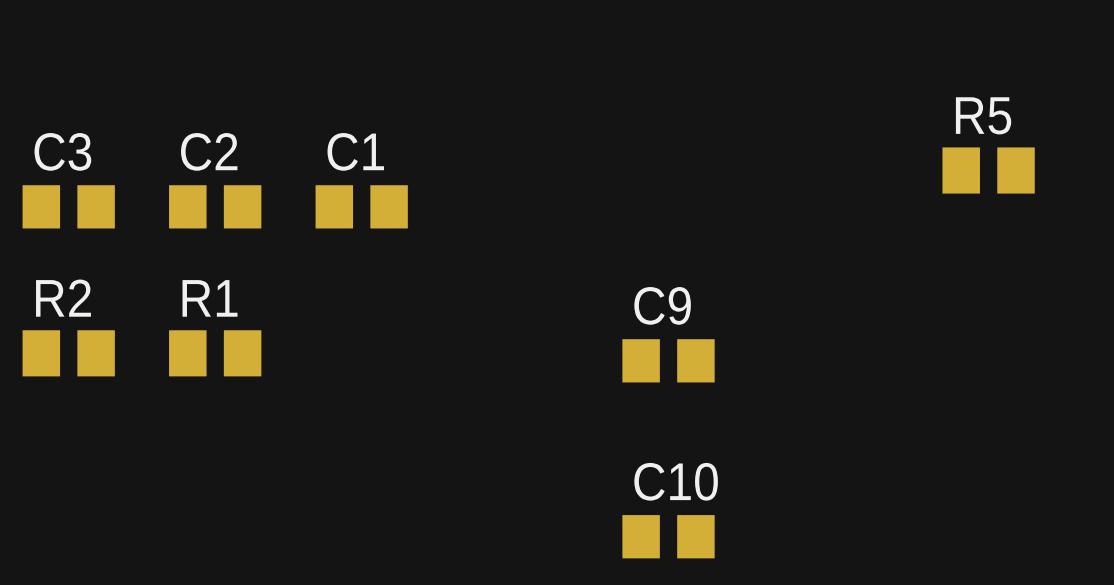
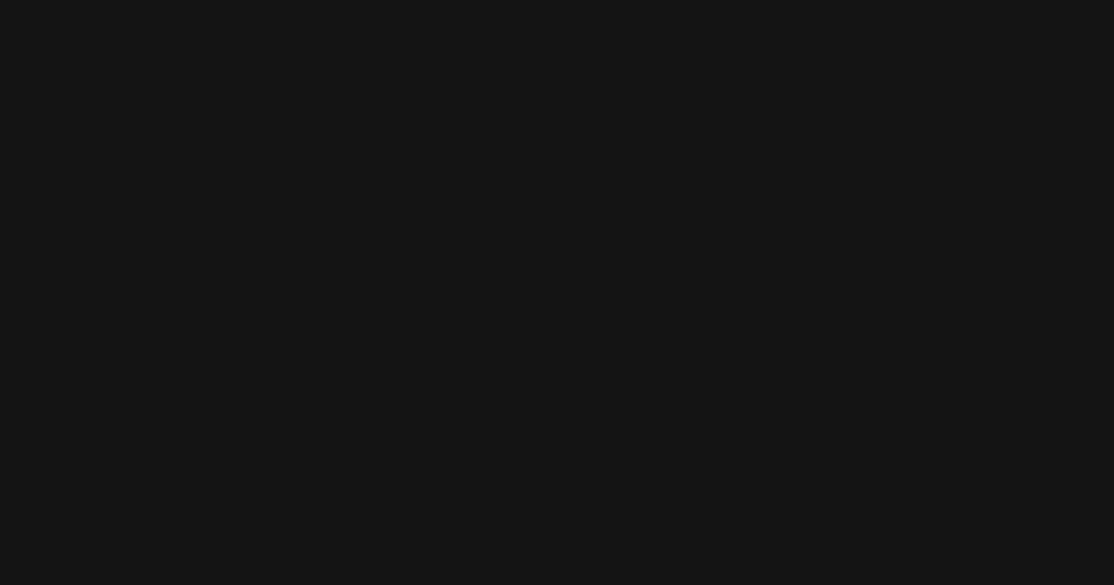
R5: (988, 170) -> none
C3: (68, 206) -> none
C2: (215, 206) -> none
C1: (361, 206) -> none
R2: (68, 353) -> none
R1: (215, 353) -> none
C9: (668, 360) -> none
C10: (668, 536) -> none

